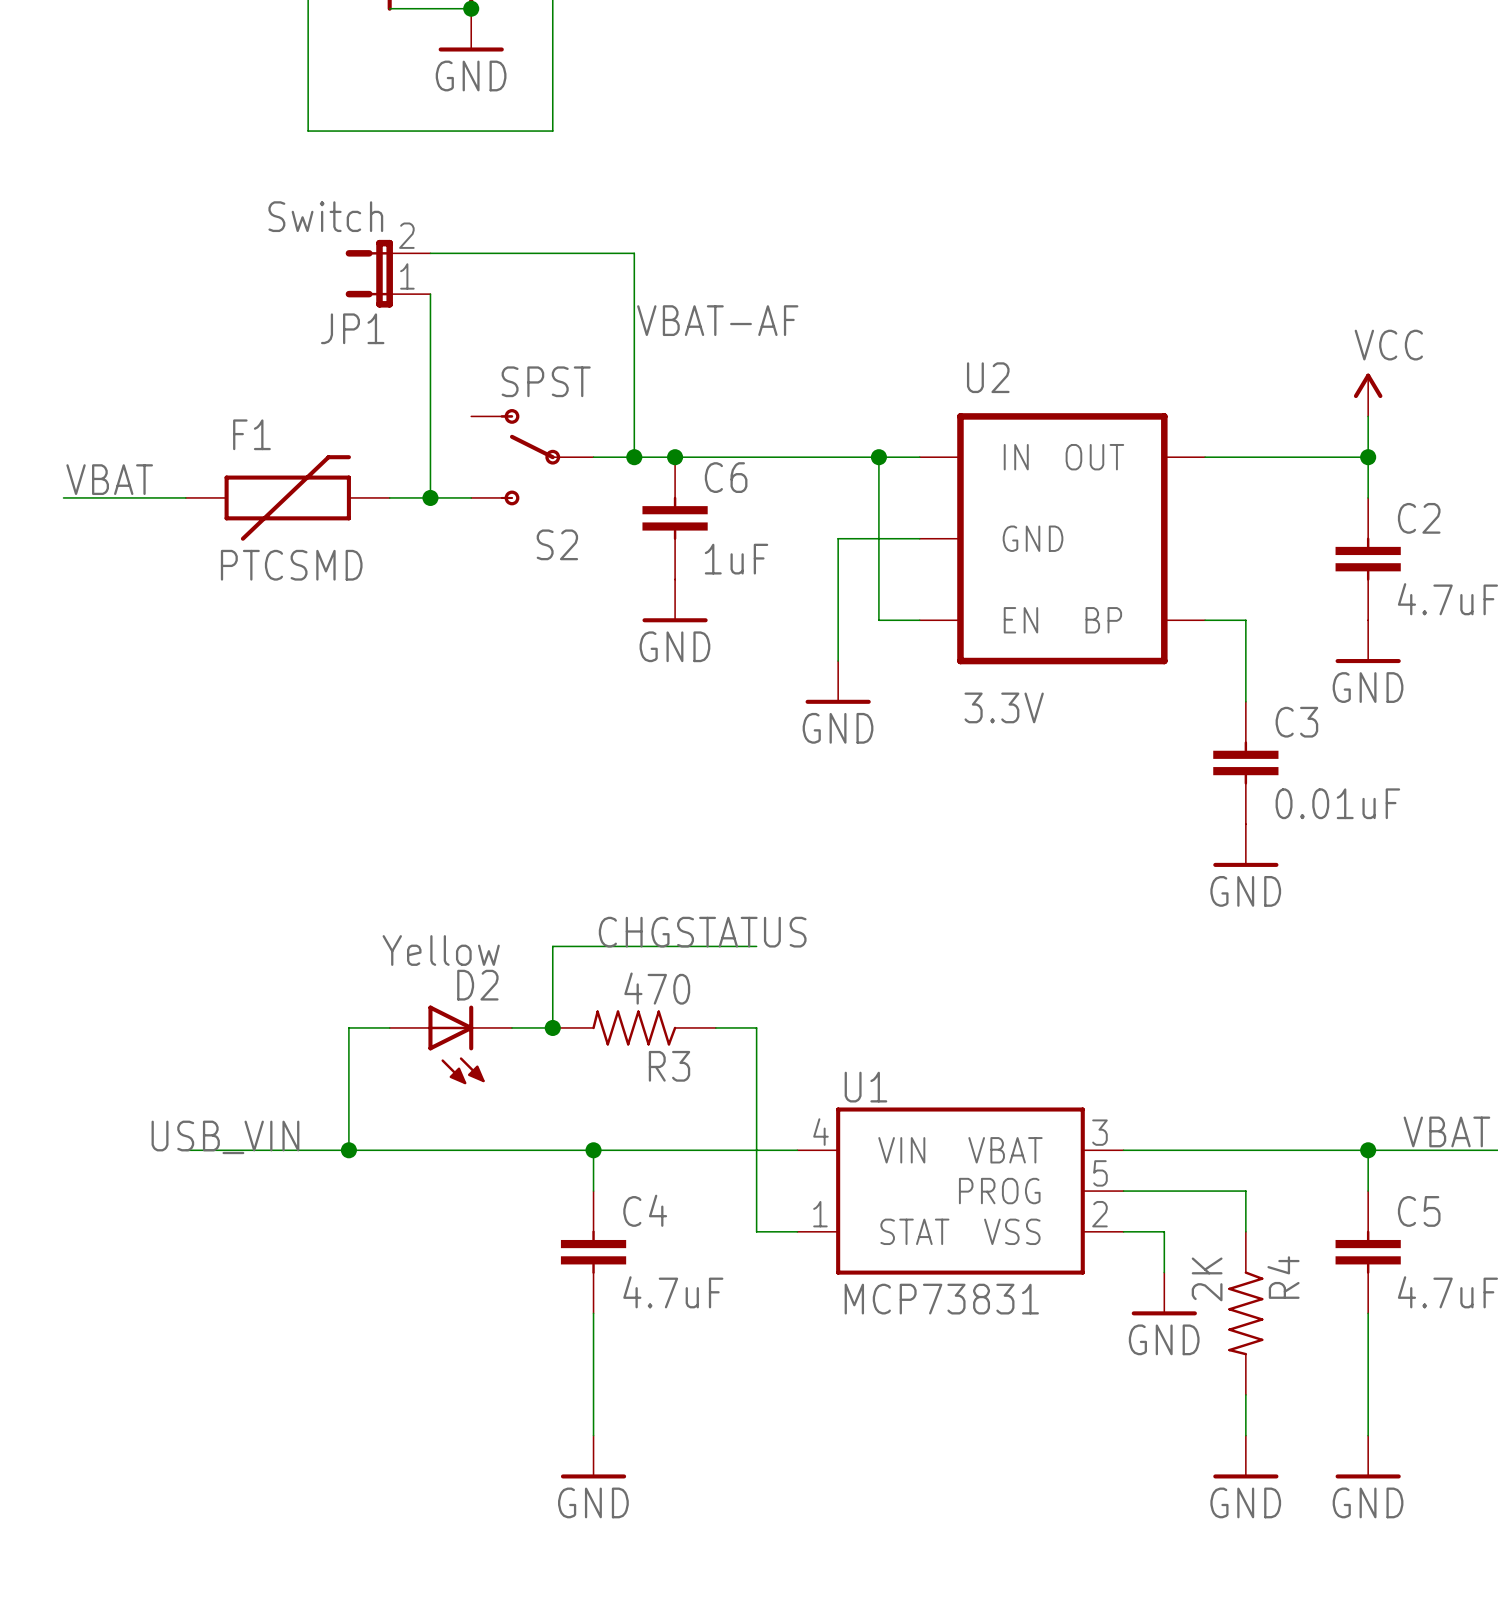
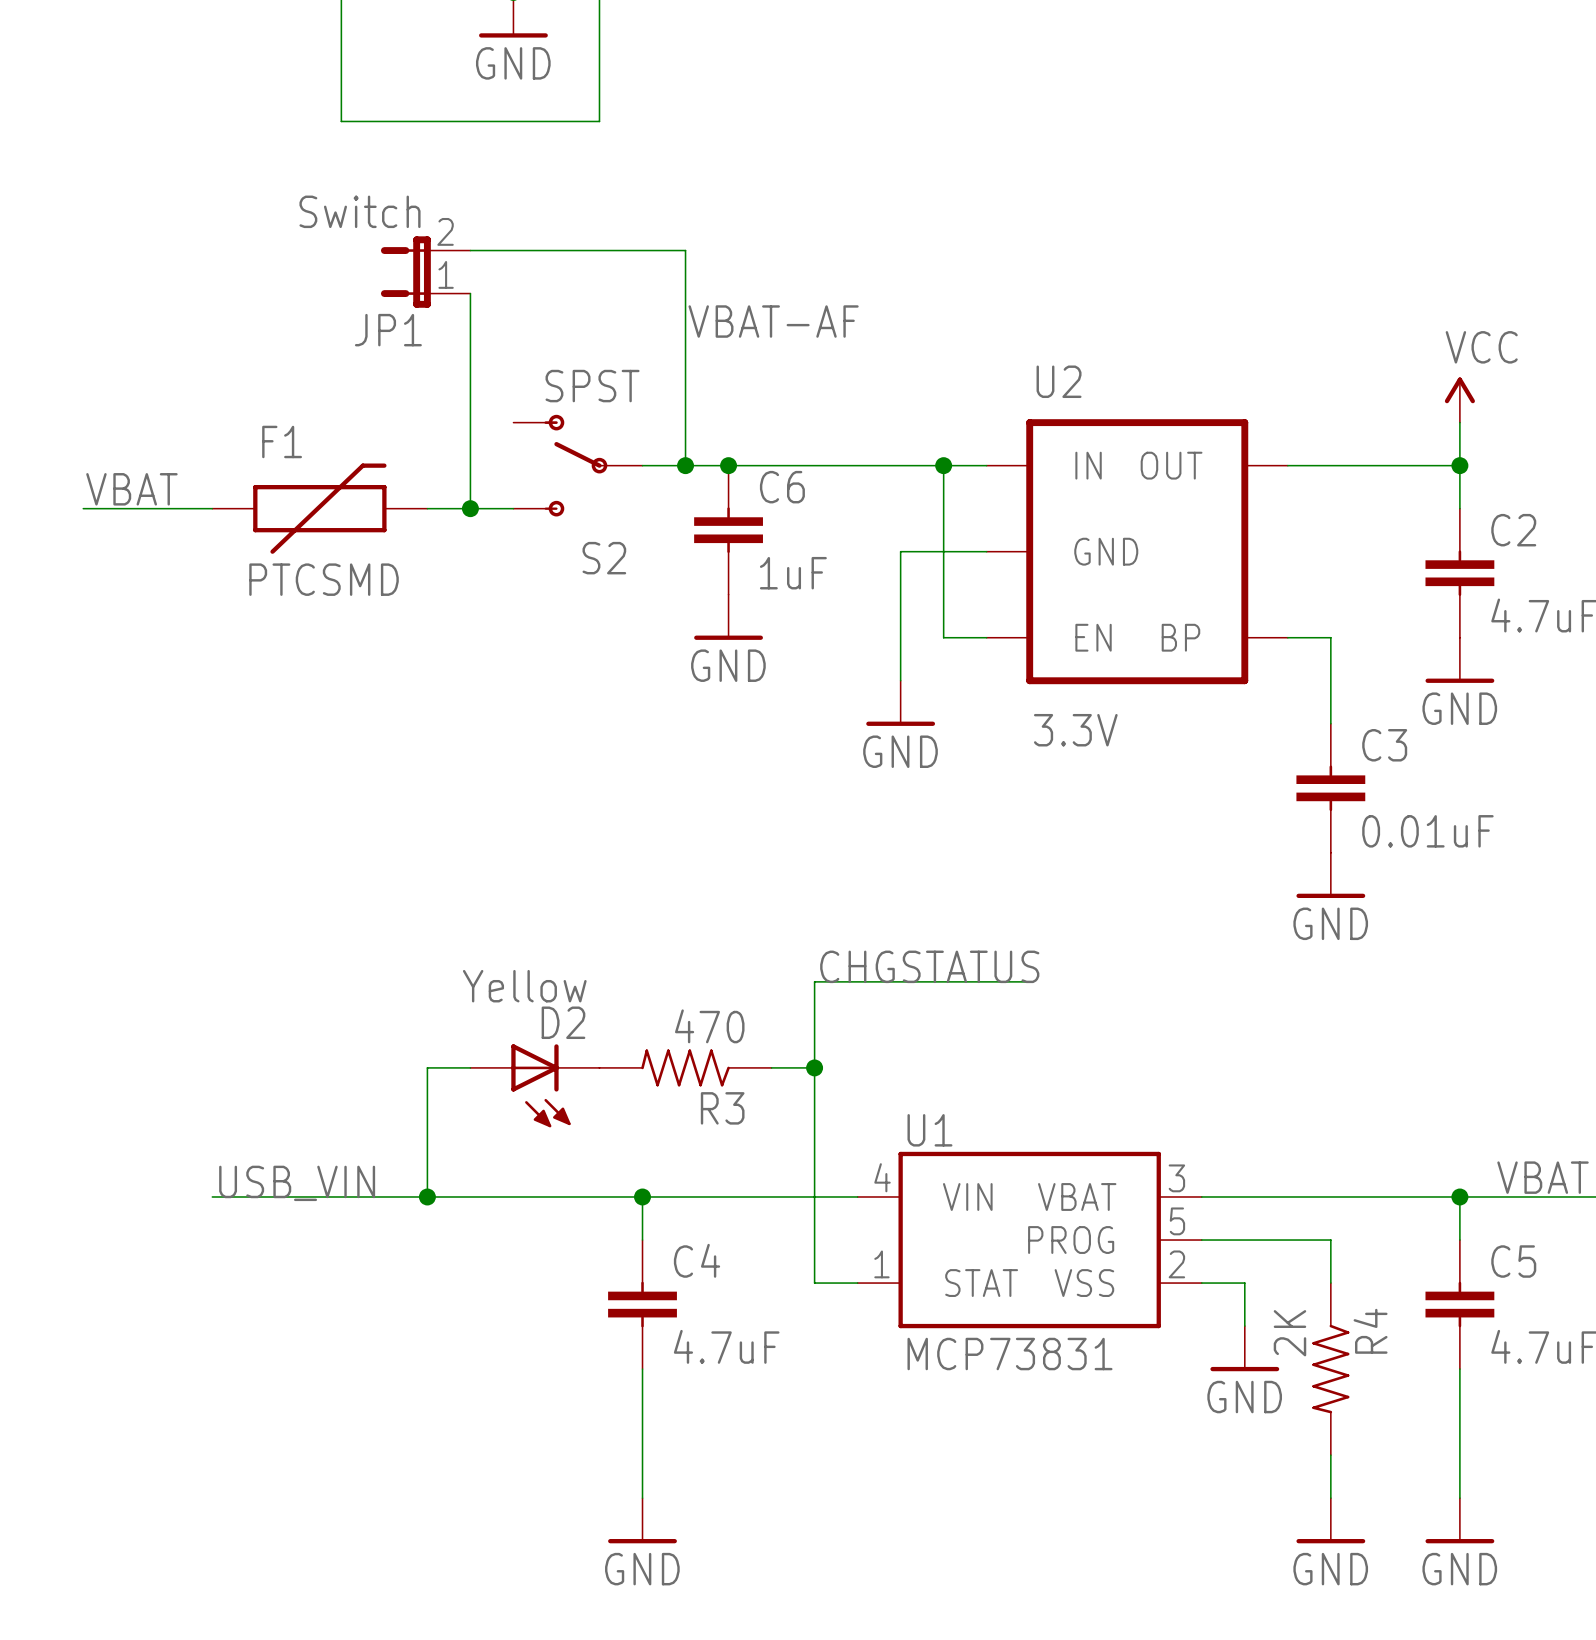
label position: CHGSTATUS (702, 932) -> CHGSTATUS (929, 966)
wire: (756, 946) (552, 946) (552, 1027) (512, 1027) -> none
wire: none -> (1029, 981) (814, 981) (814, 1067)
wire: (389, 1027) (348, 1027) (348, 1150) -> (470, 1067) (427, 1067) (427, 1196)
junction: (552, 1027) -> none
junction: none -> (814, 1067)
D2 position: (450, 1044) -> (534, 1085)
label position: USB_VIN (225, 1137) -> USB_VIN (297, 1183)
junction position: (348, 1150) -> (427, 1196)

